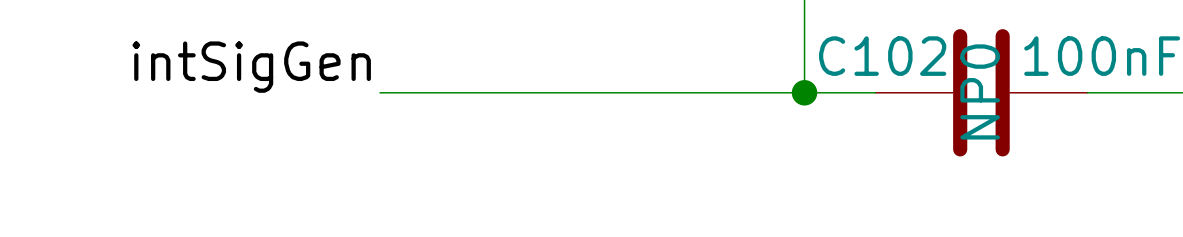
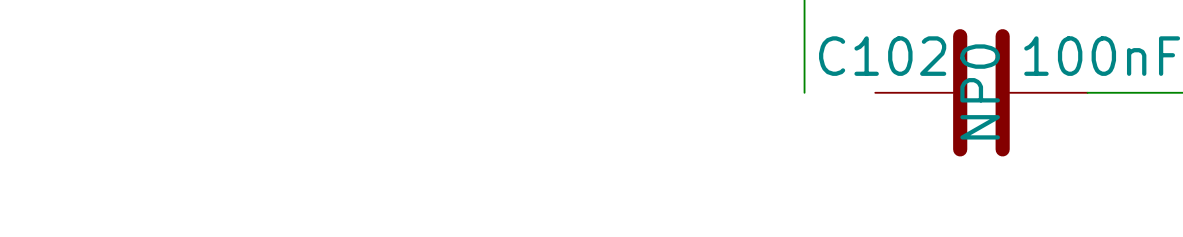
label: intSigGen (251, 67) -> none
wire: (380, 92) (875, 92) -> none
junction: (804, 92) -> none

